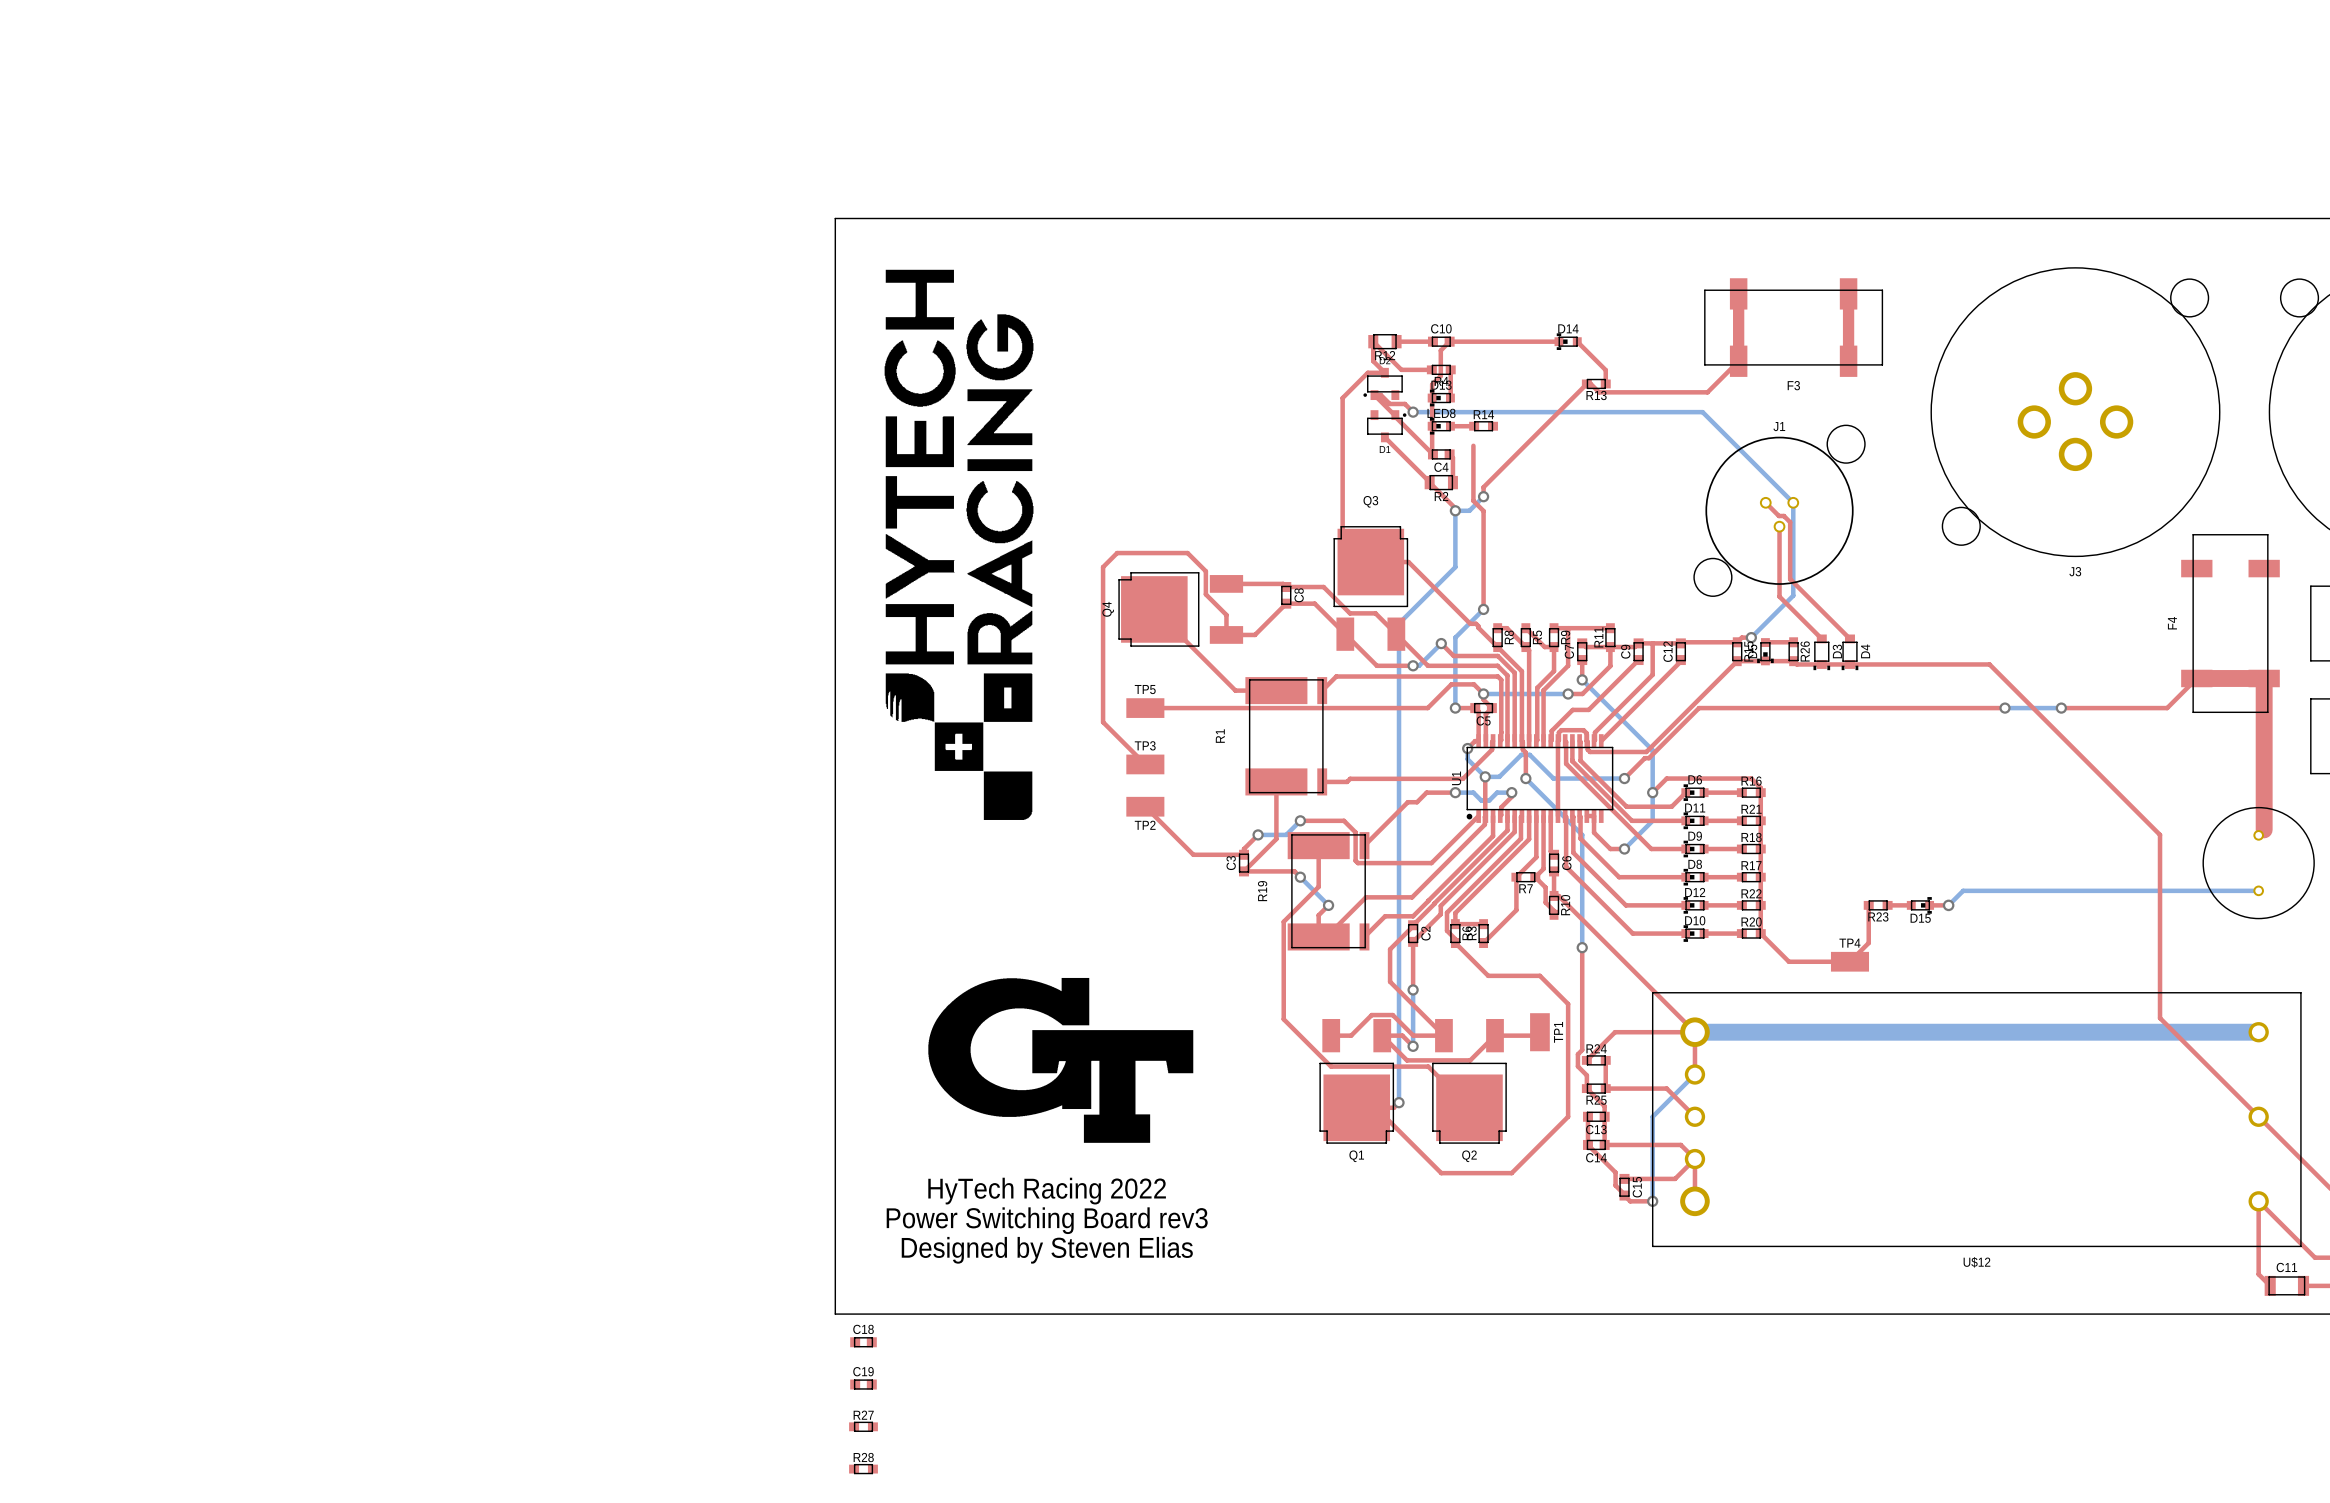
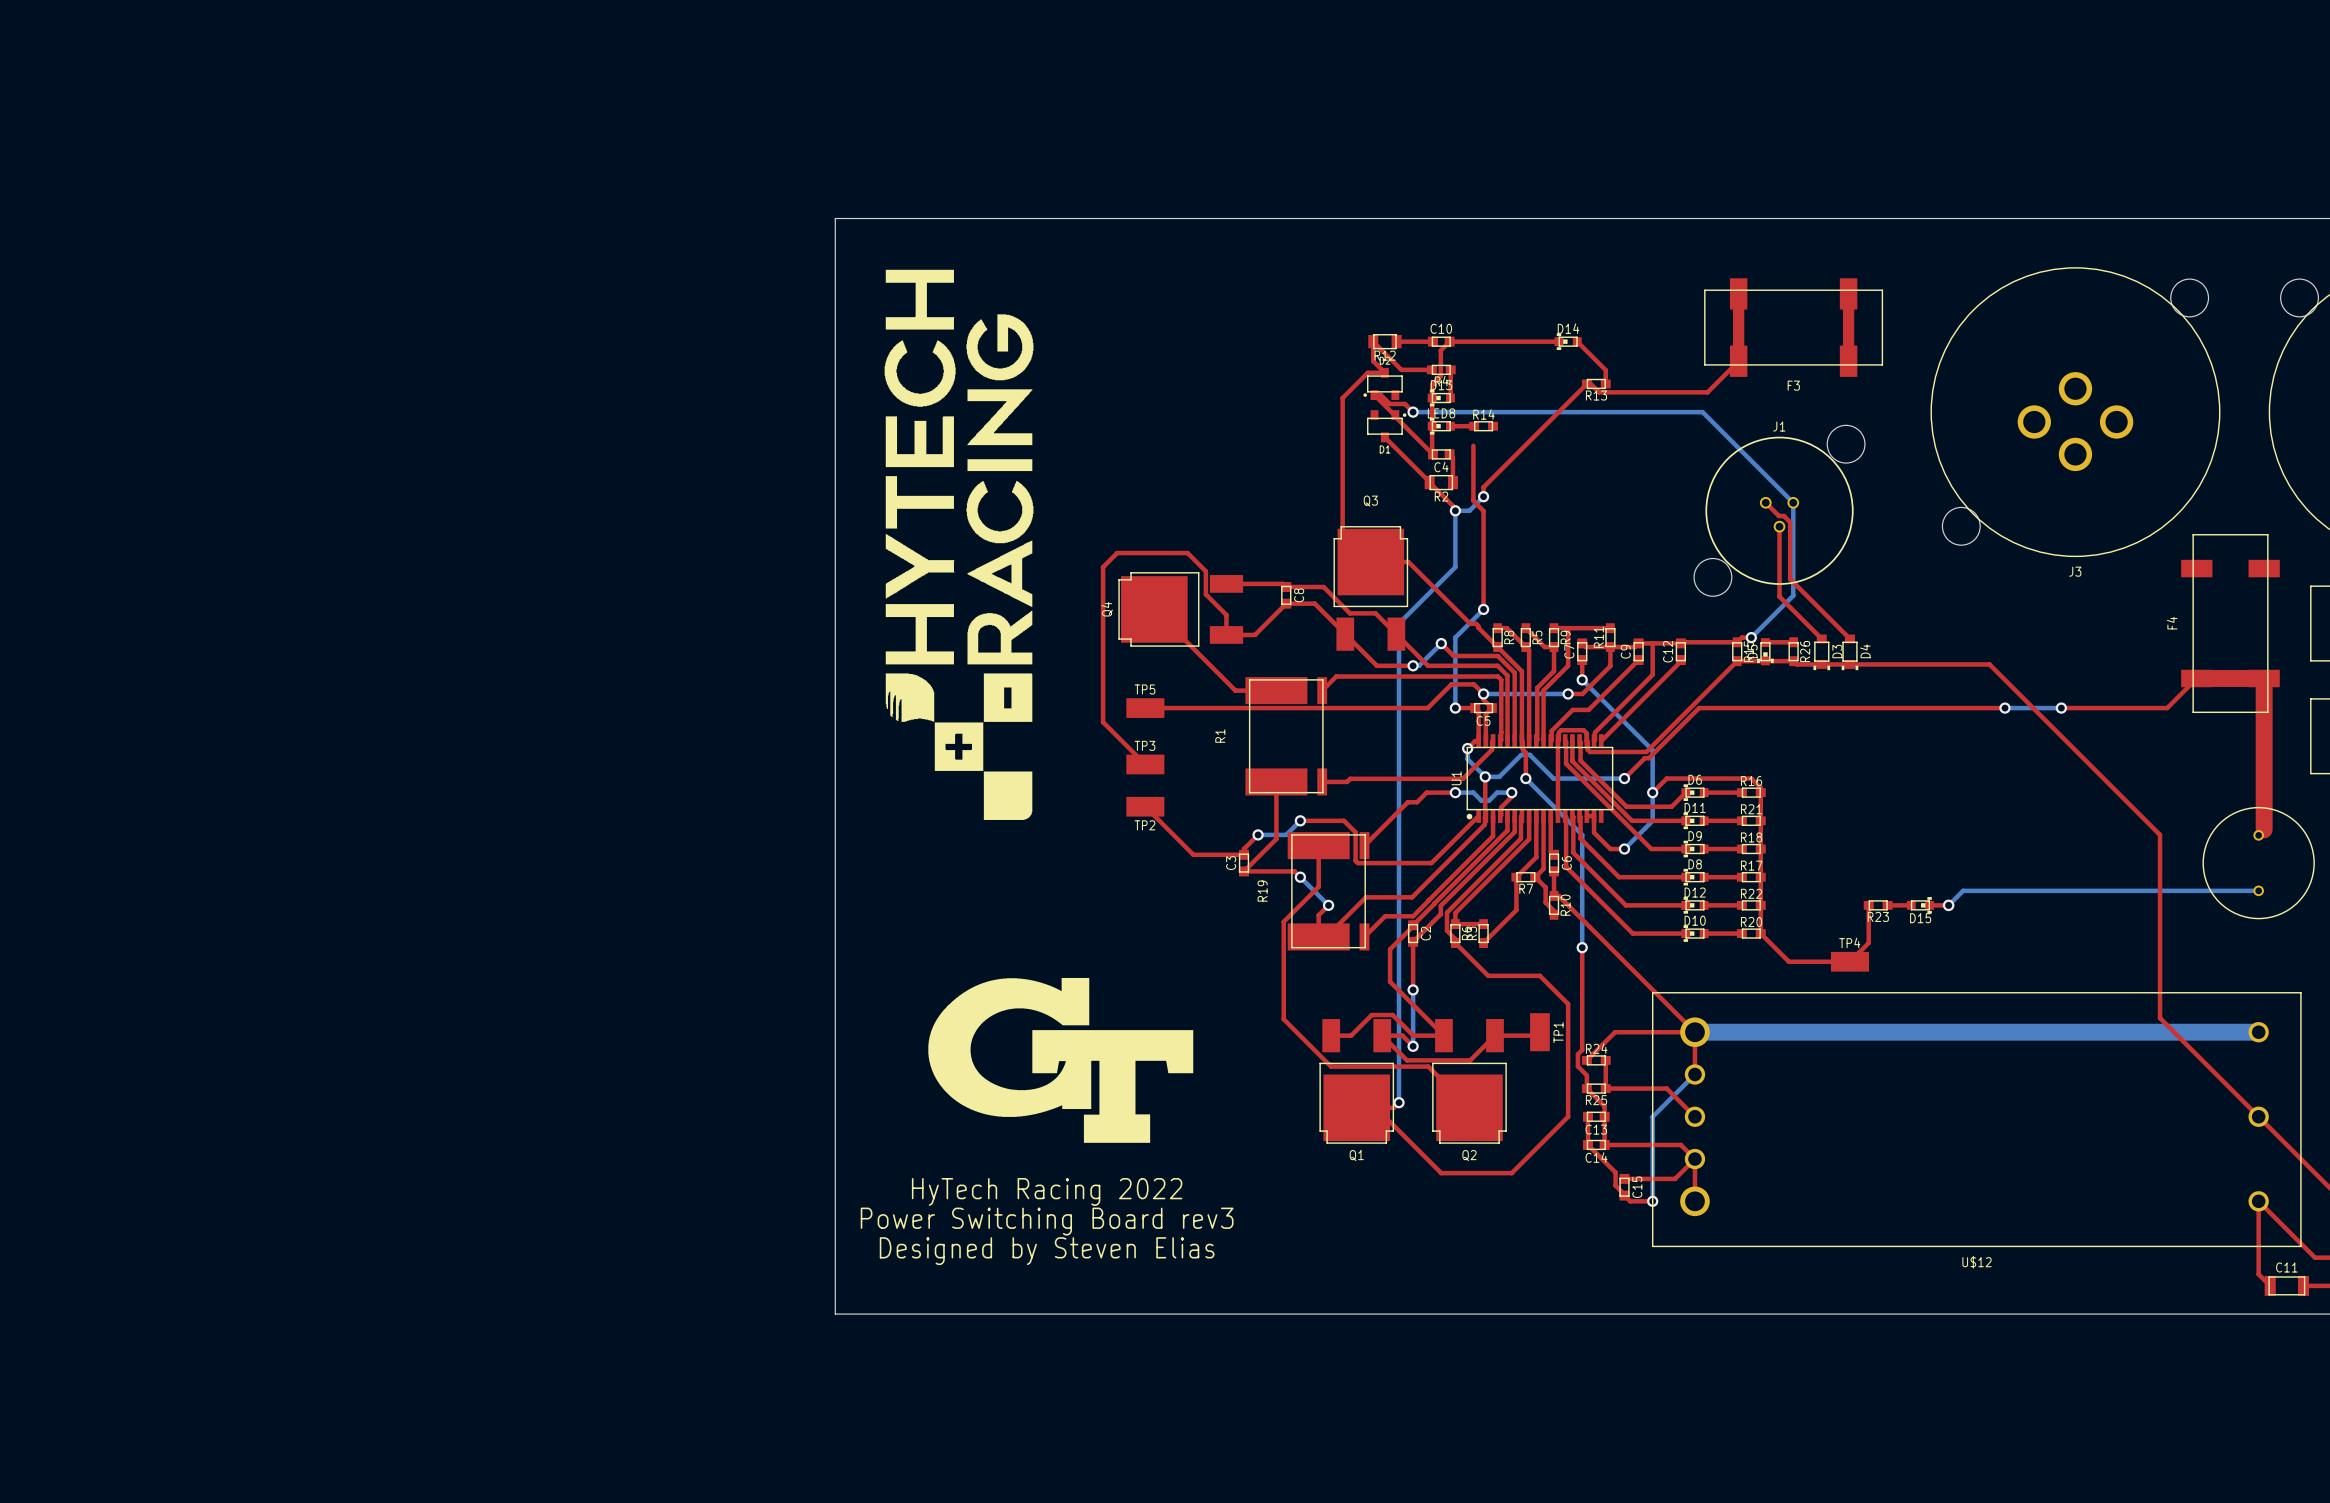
C18: (863, 1342) -> none
C19: (863, 1384) -> none
R27: (863, 1426) -> none
R28: (863, 1469) -> none

